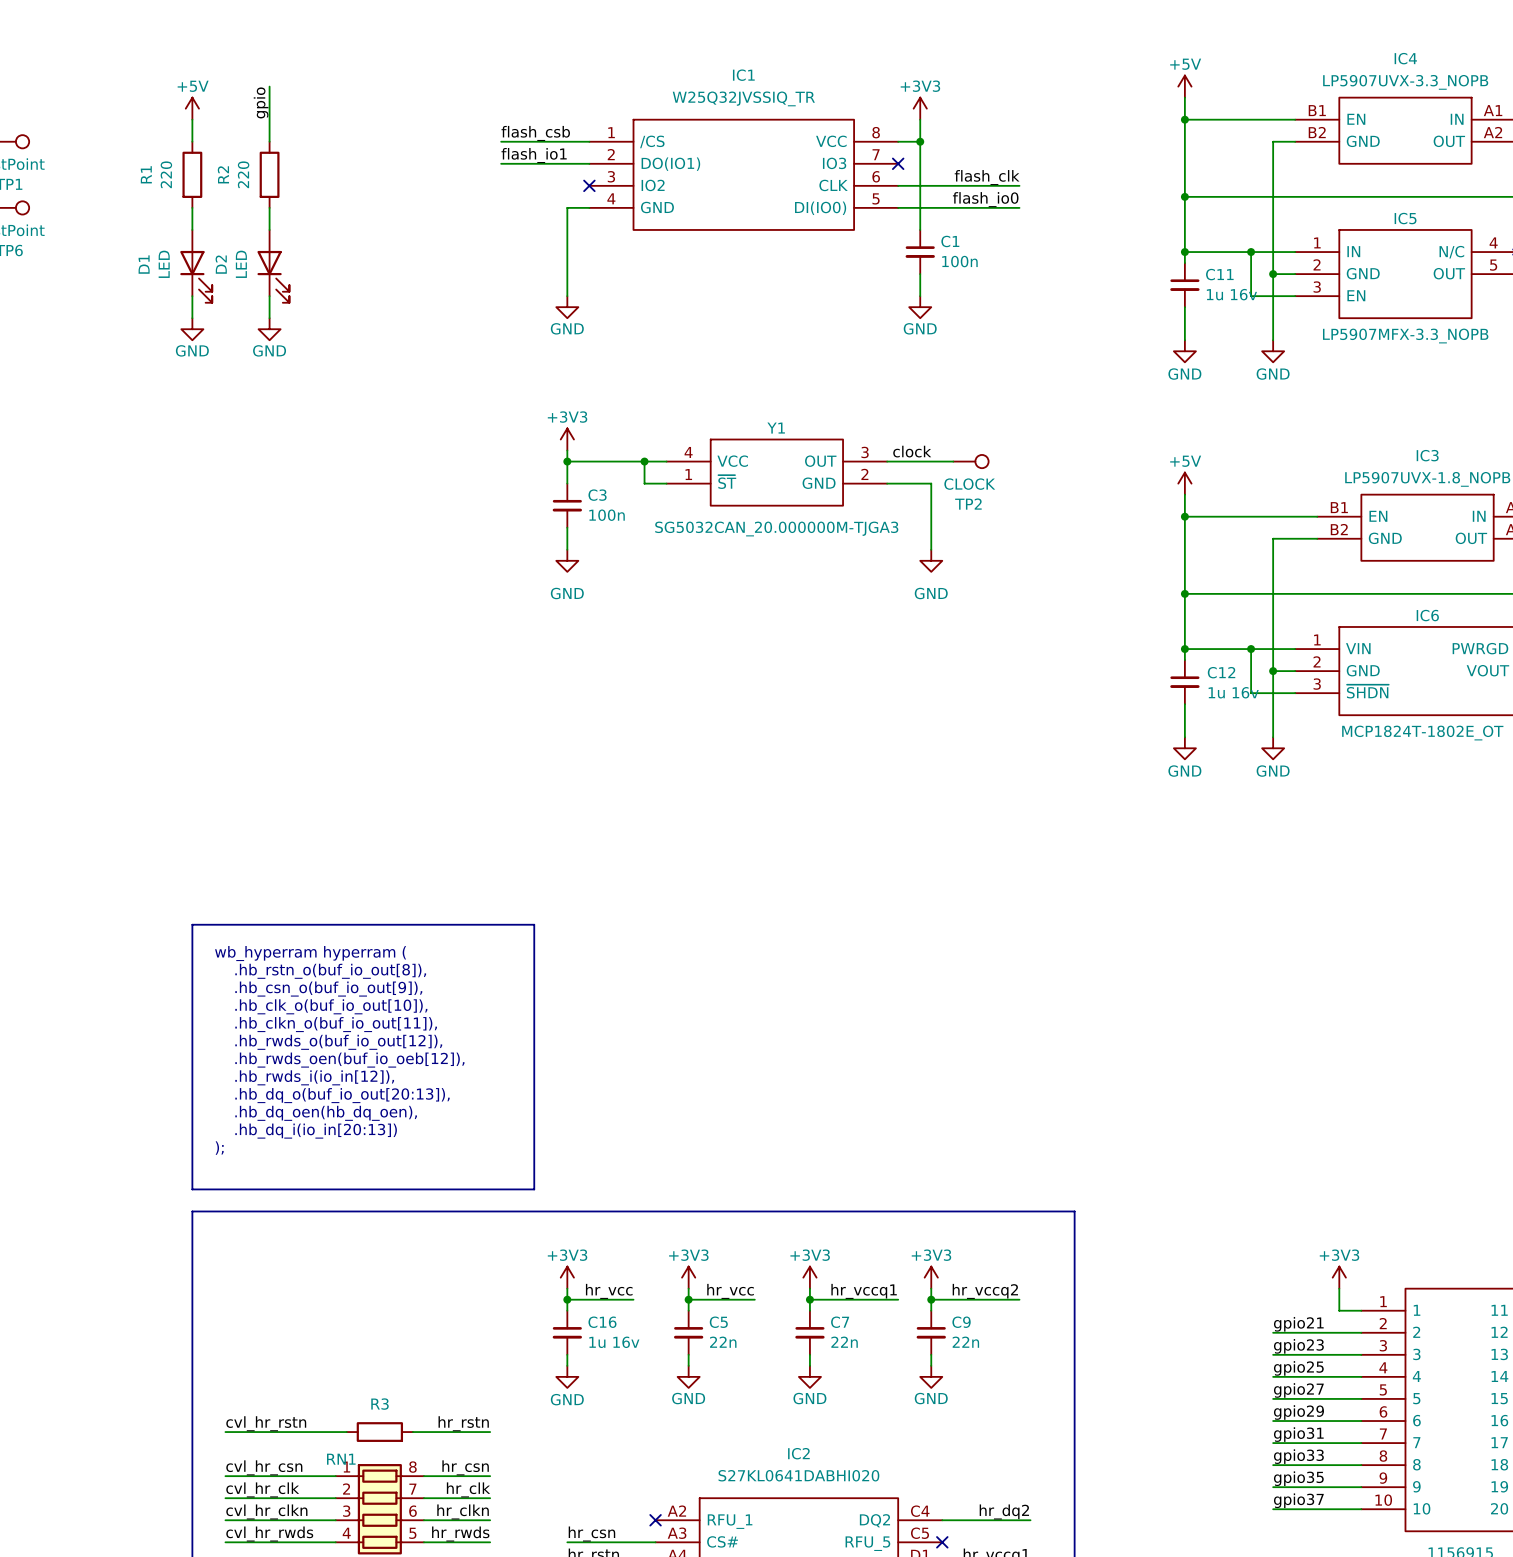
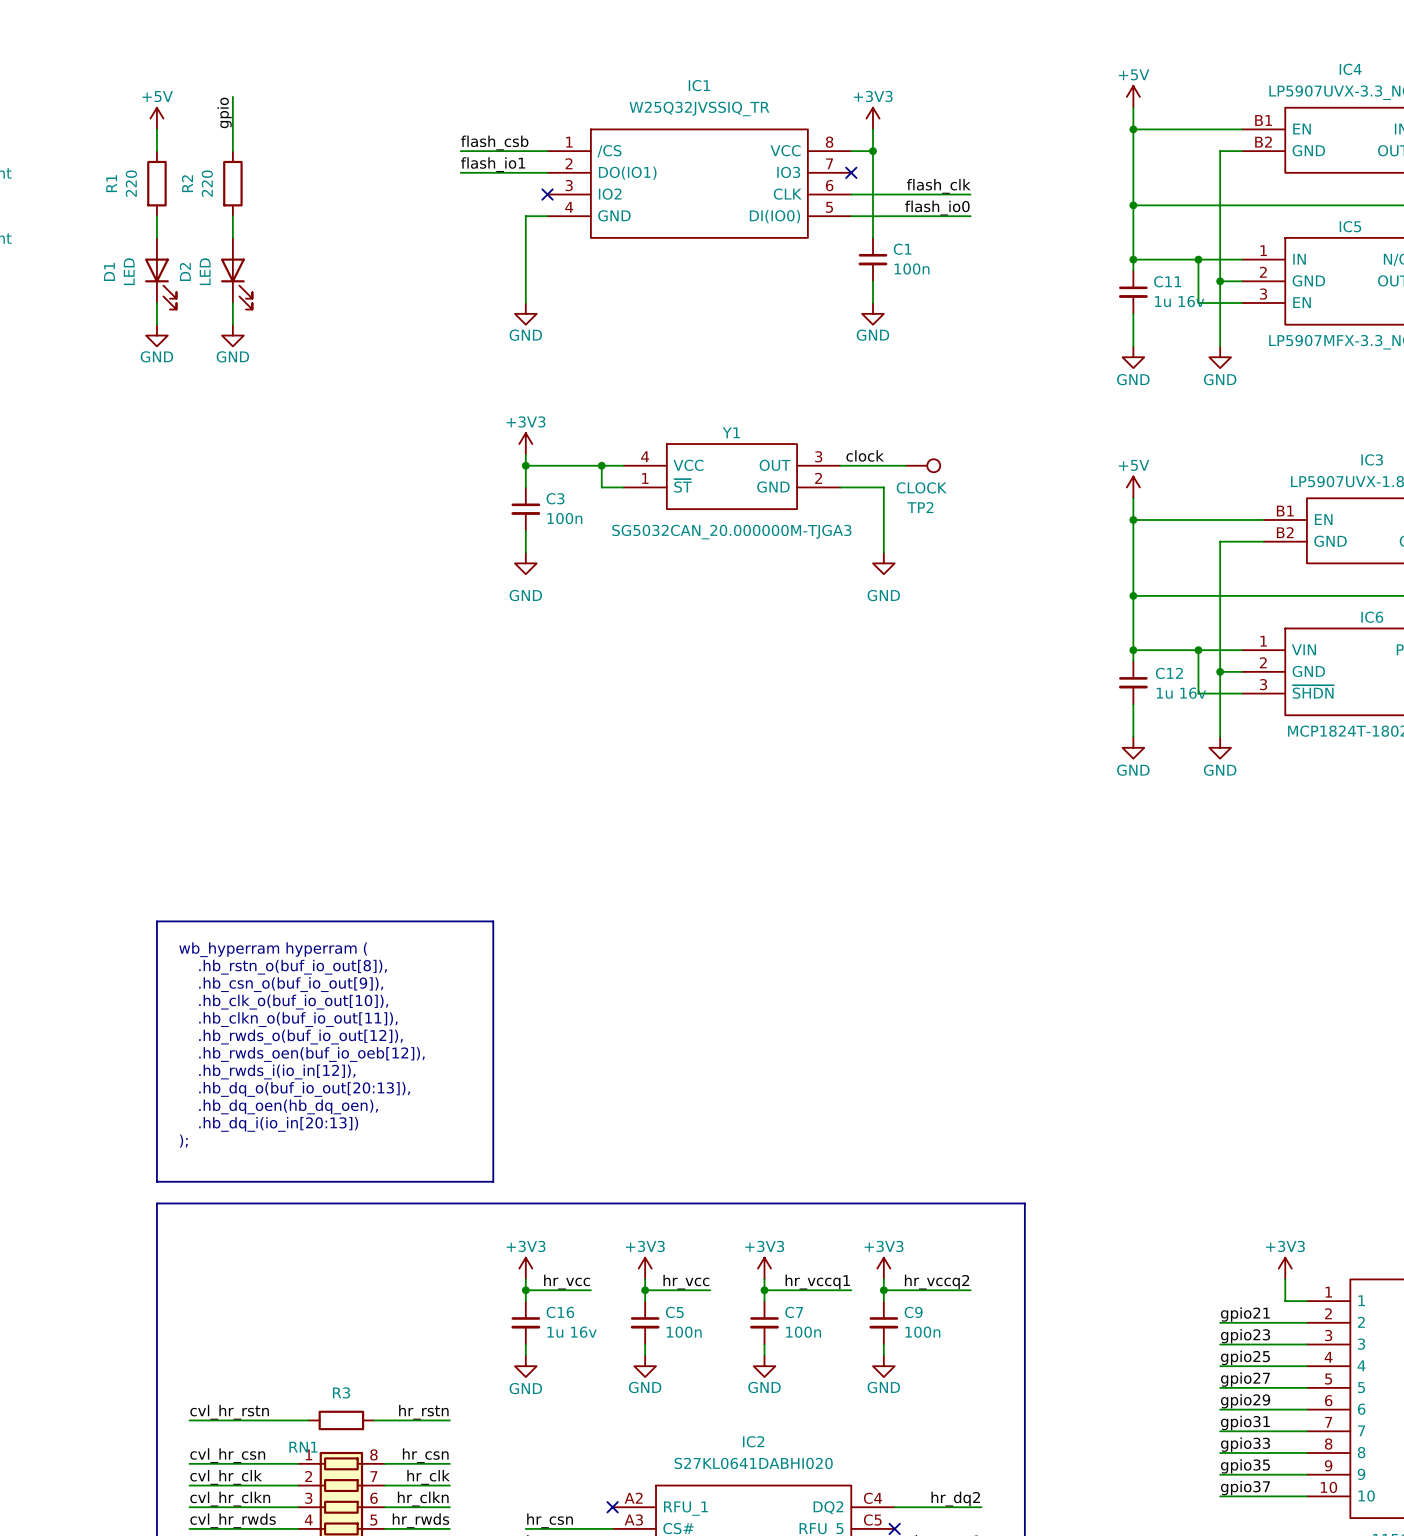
C5 value: 22n (723, 1342) -> 100n (684, 1332)
C7 value: 22n (844, 1342) -> 100n (803, 1332)
C9 value: 22n (965, 1342) -> 100n (922, 1332)

